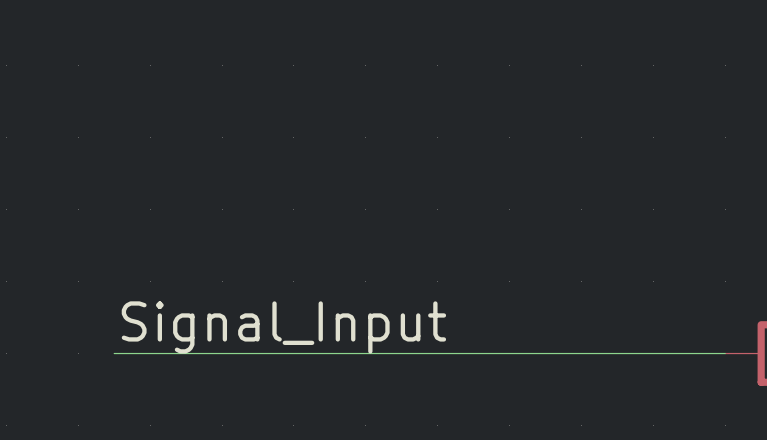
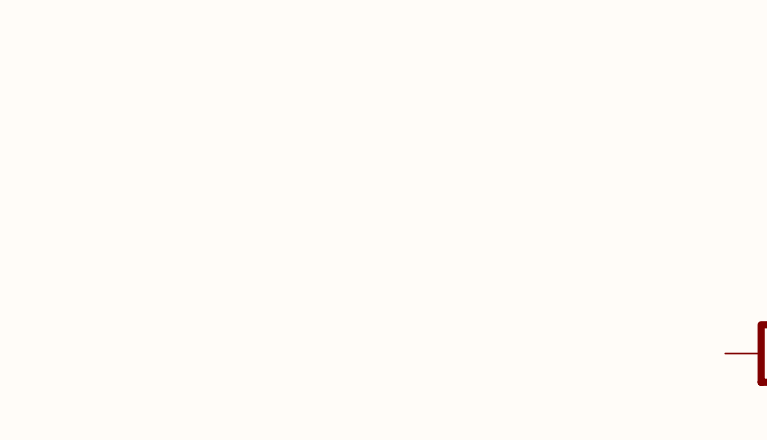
label: Signal_Input (283, 327) -> none
wire: (114, 353) (725, 353) -> none

